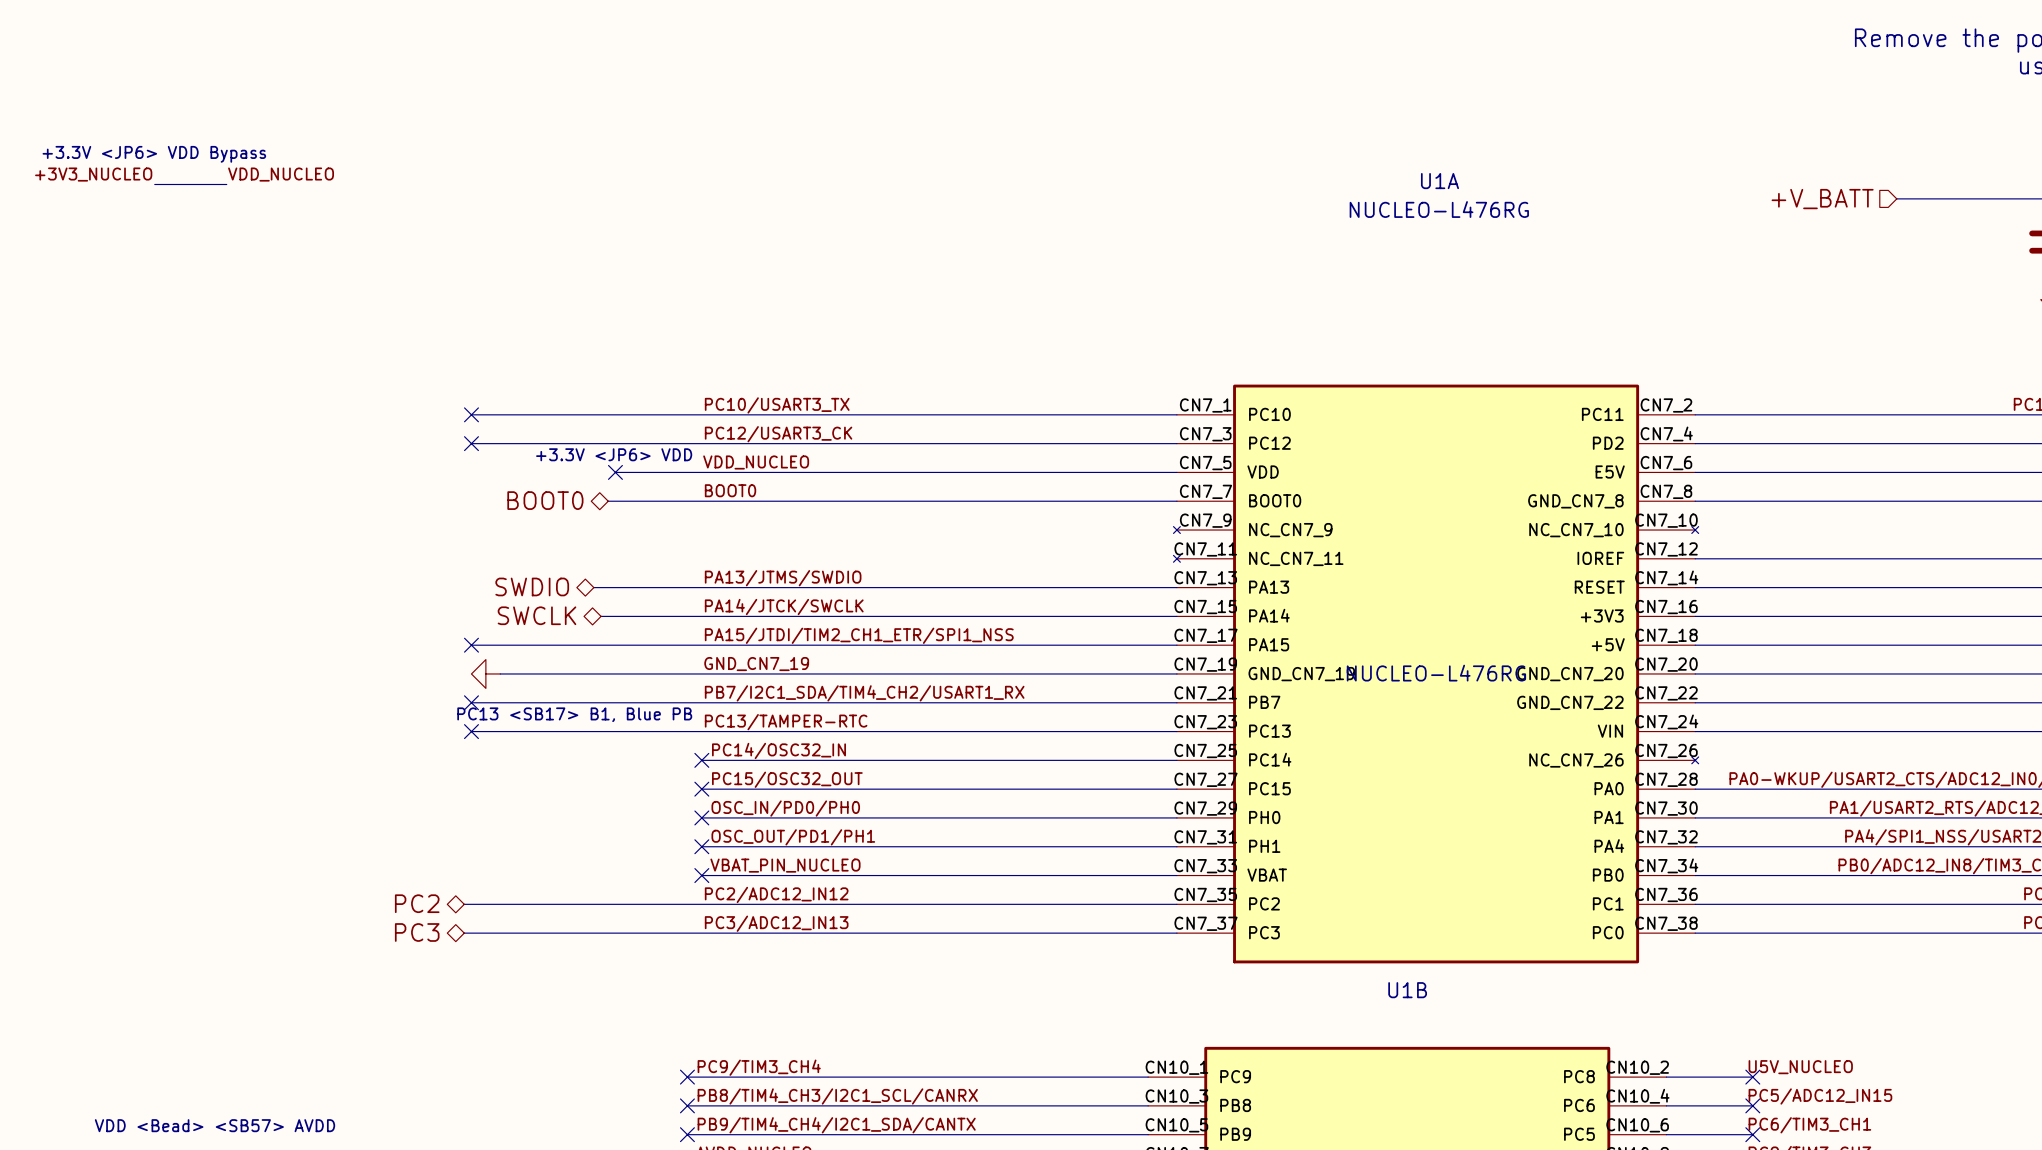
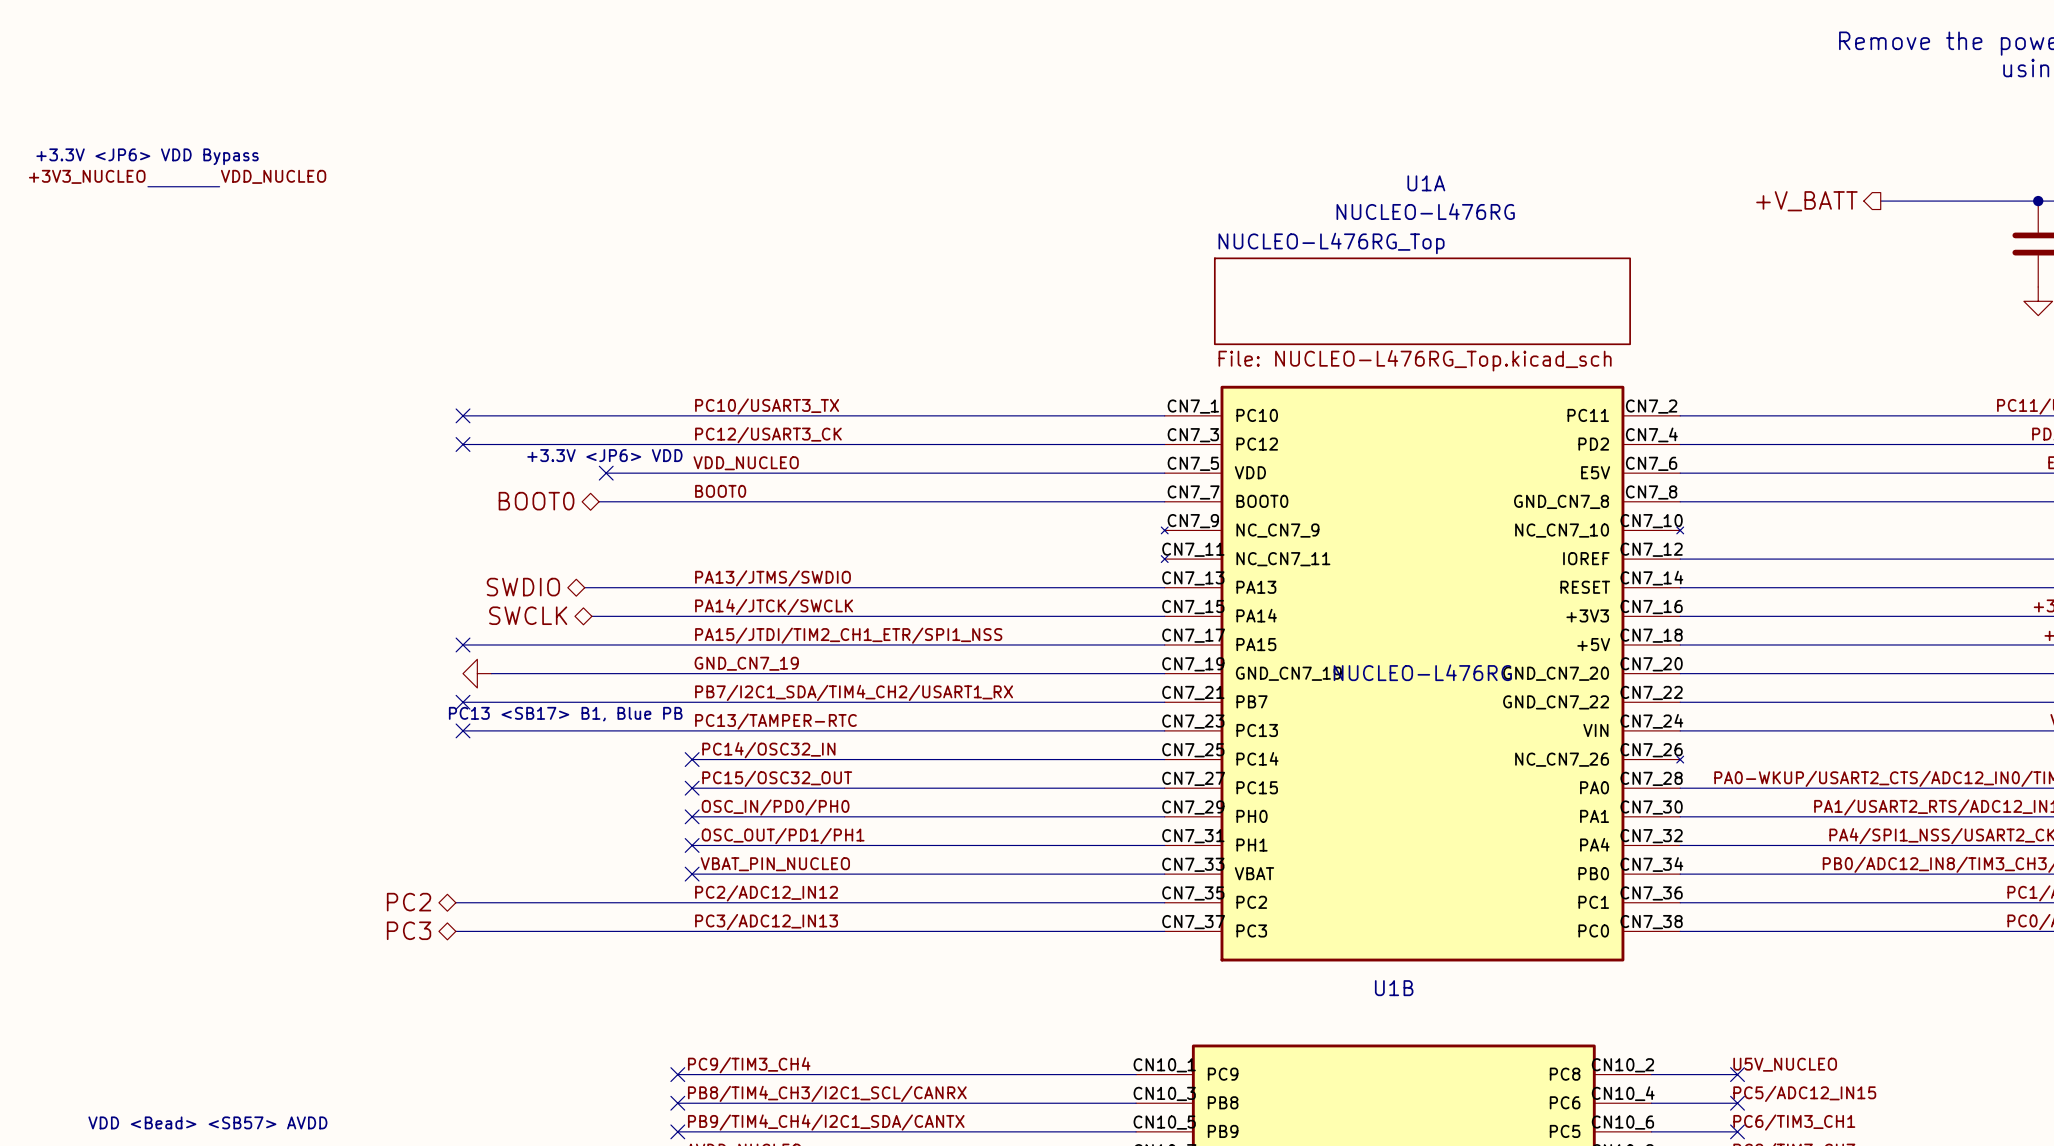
hierarchical label shape: input (1822, 199) -> output (1806, 201)
sheet NUCLEO-L476RG_Top: none -> File: NUCLEO-L476RG_Top.kicad_sch (1422, 301)

